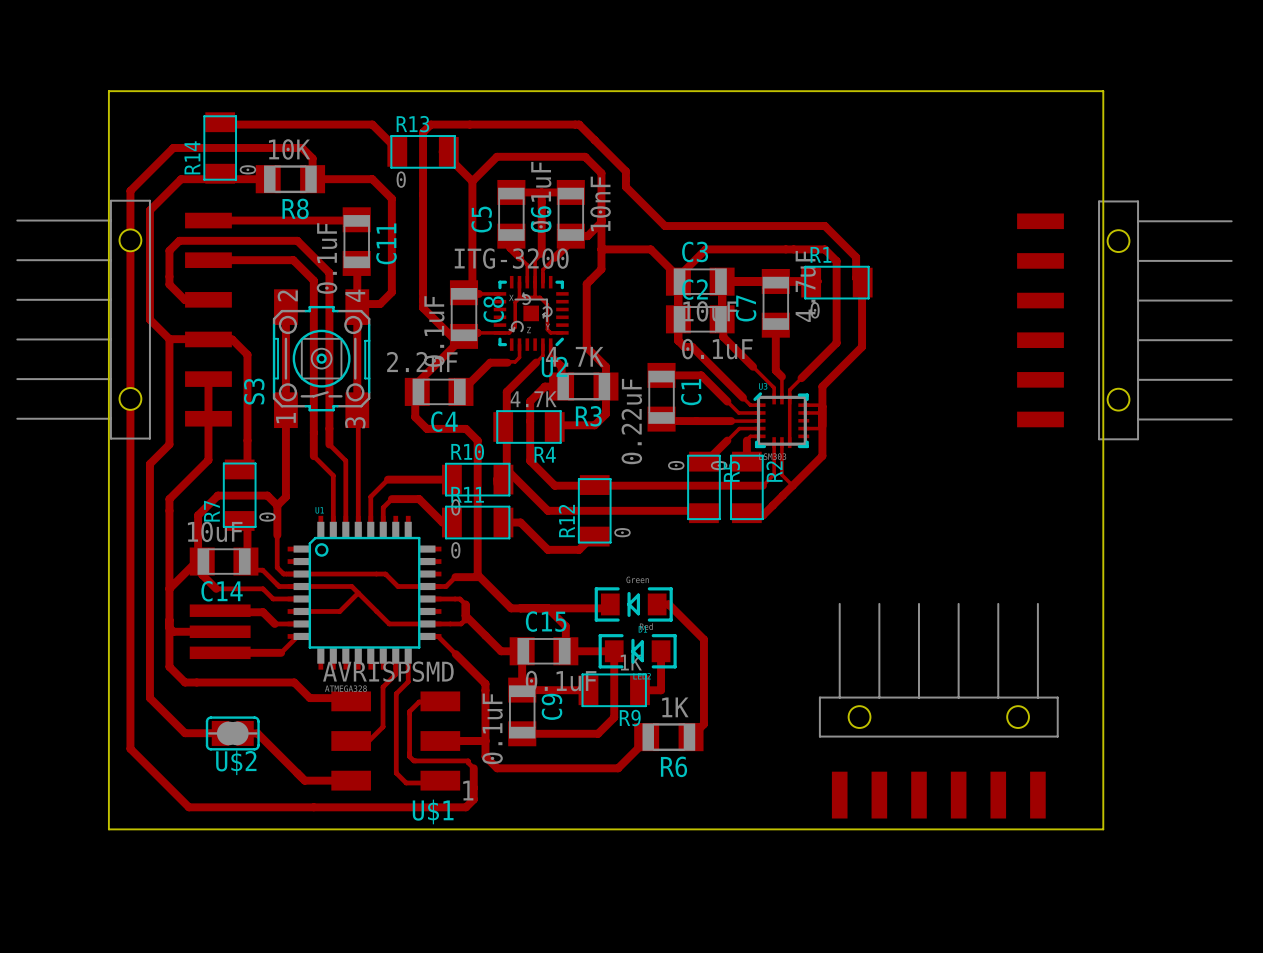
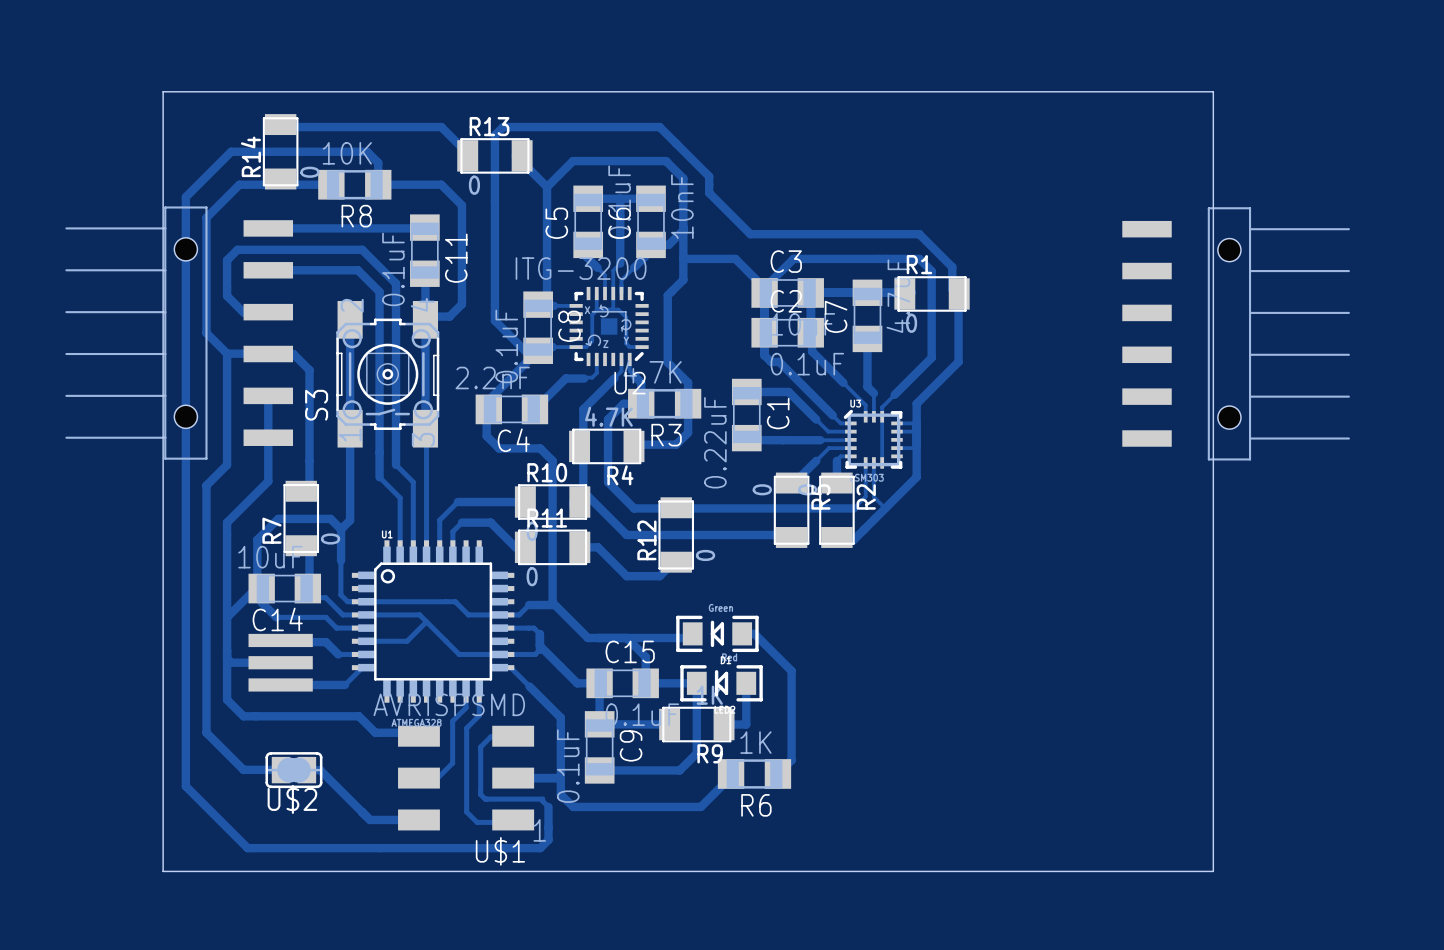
part: (938, 710) -> none

